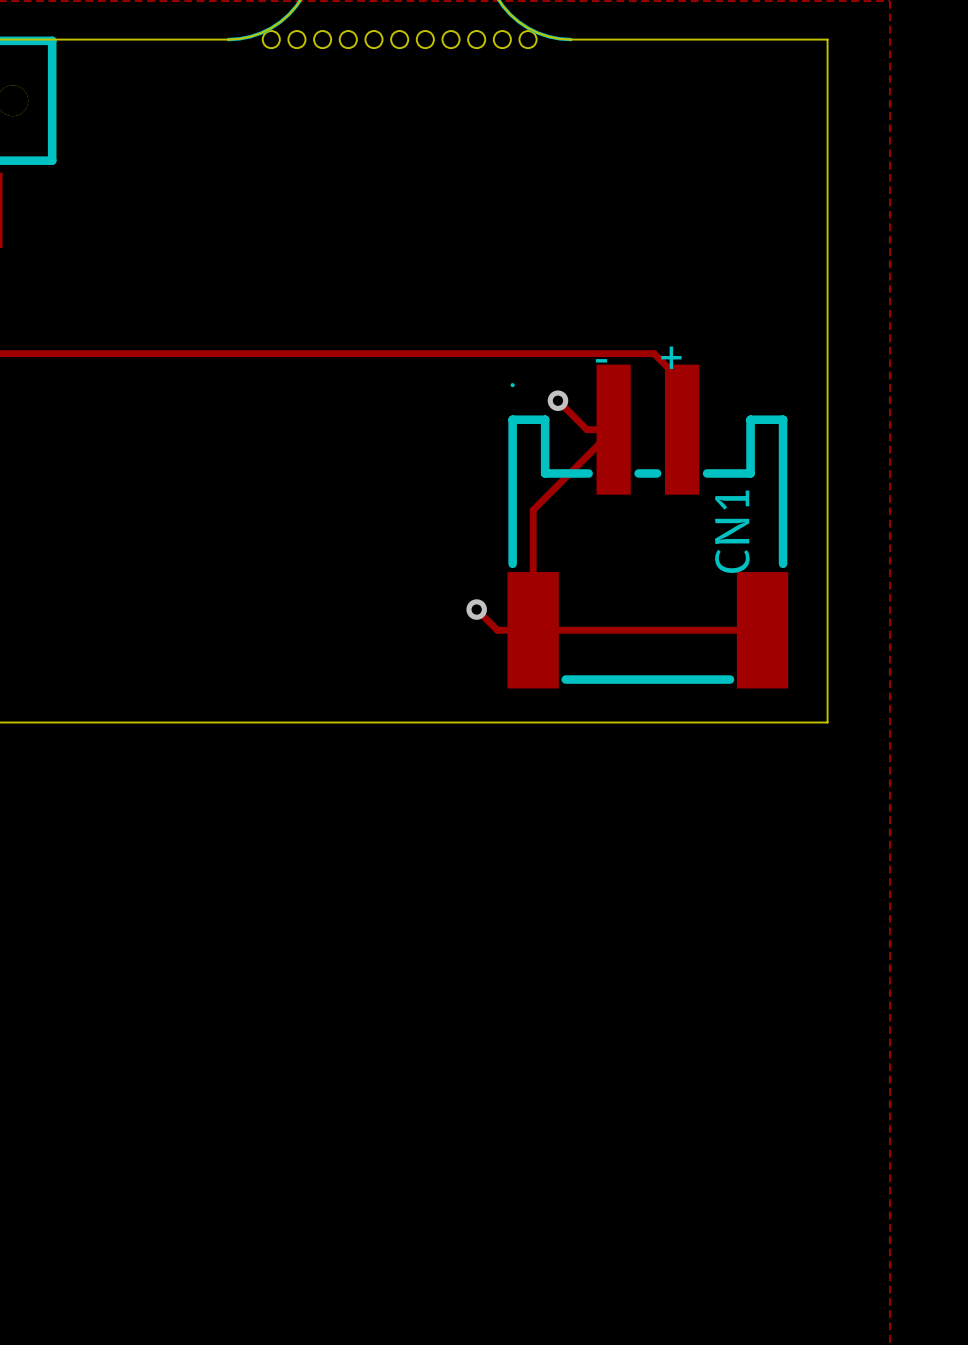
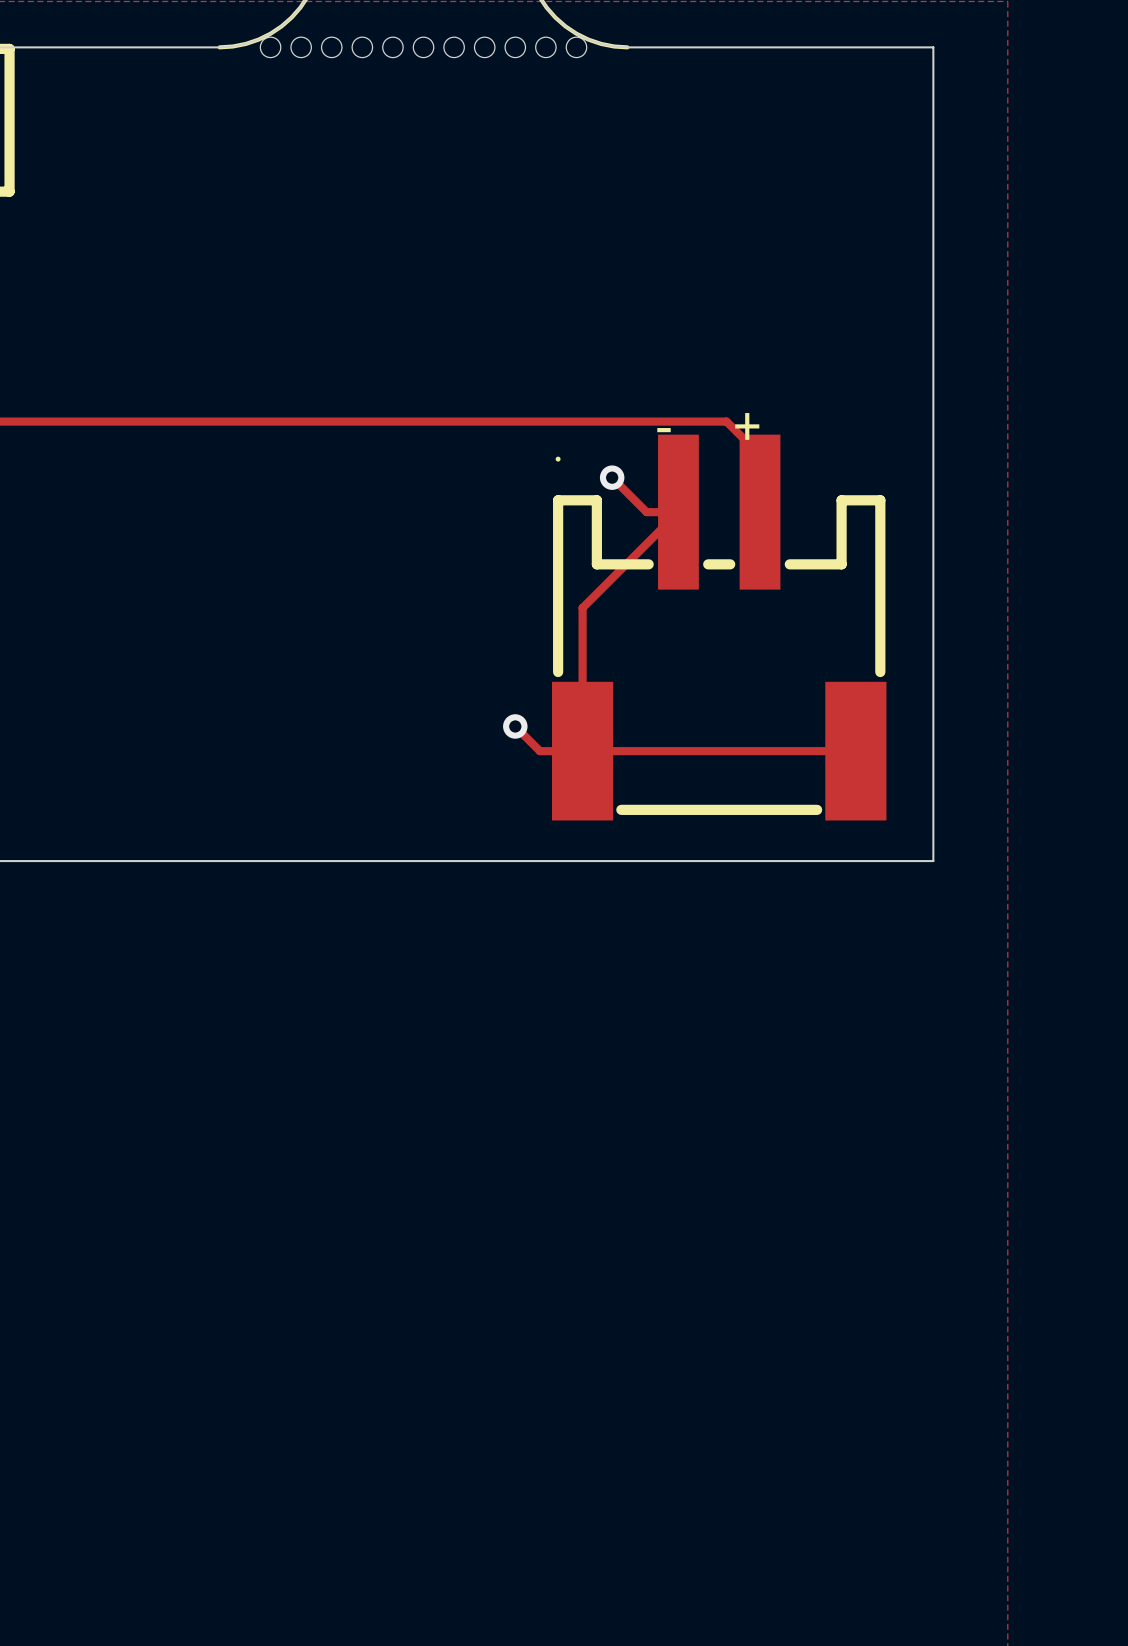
CN1 name: CN1 (732, 531) -> none

